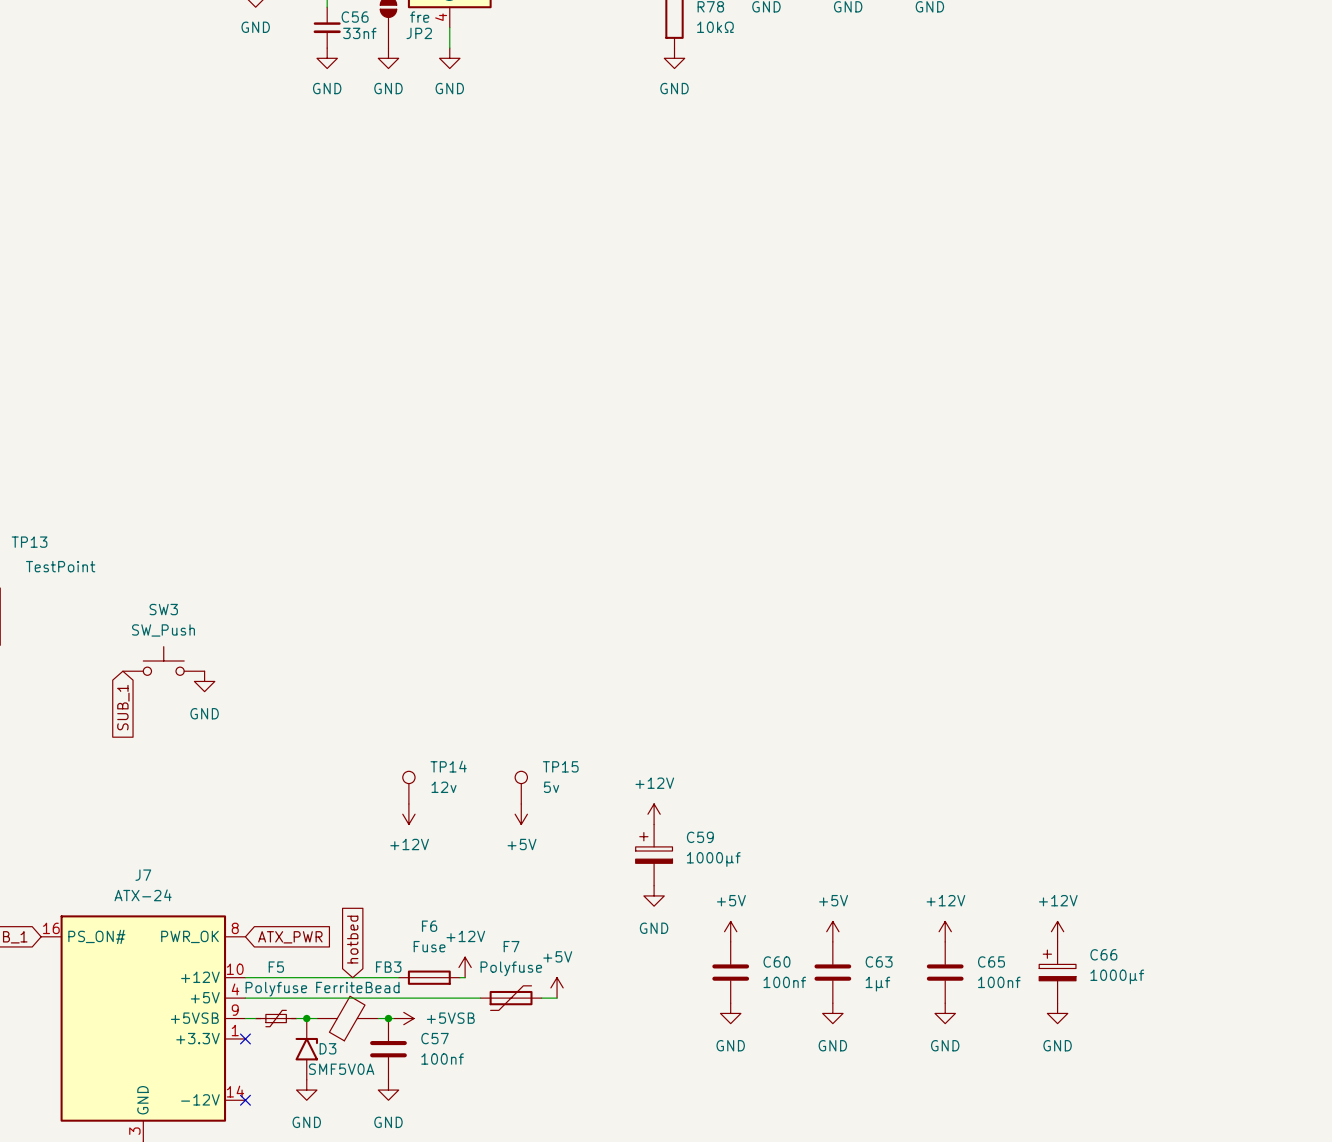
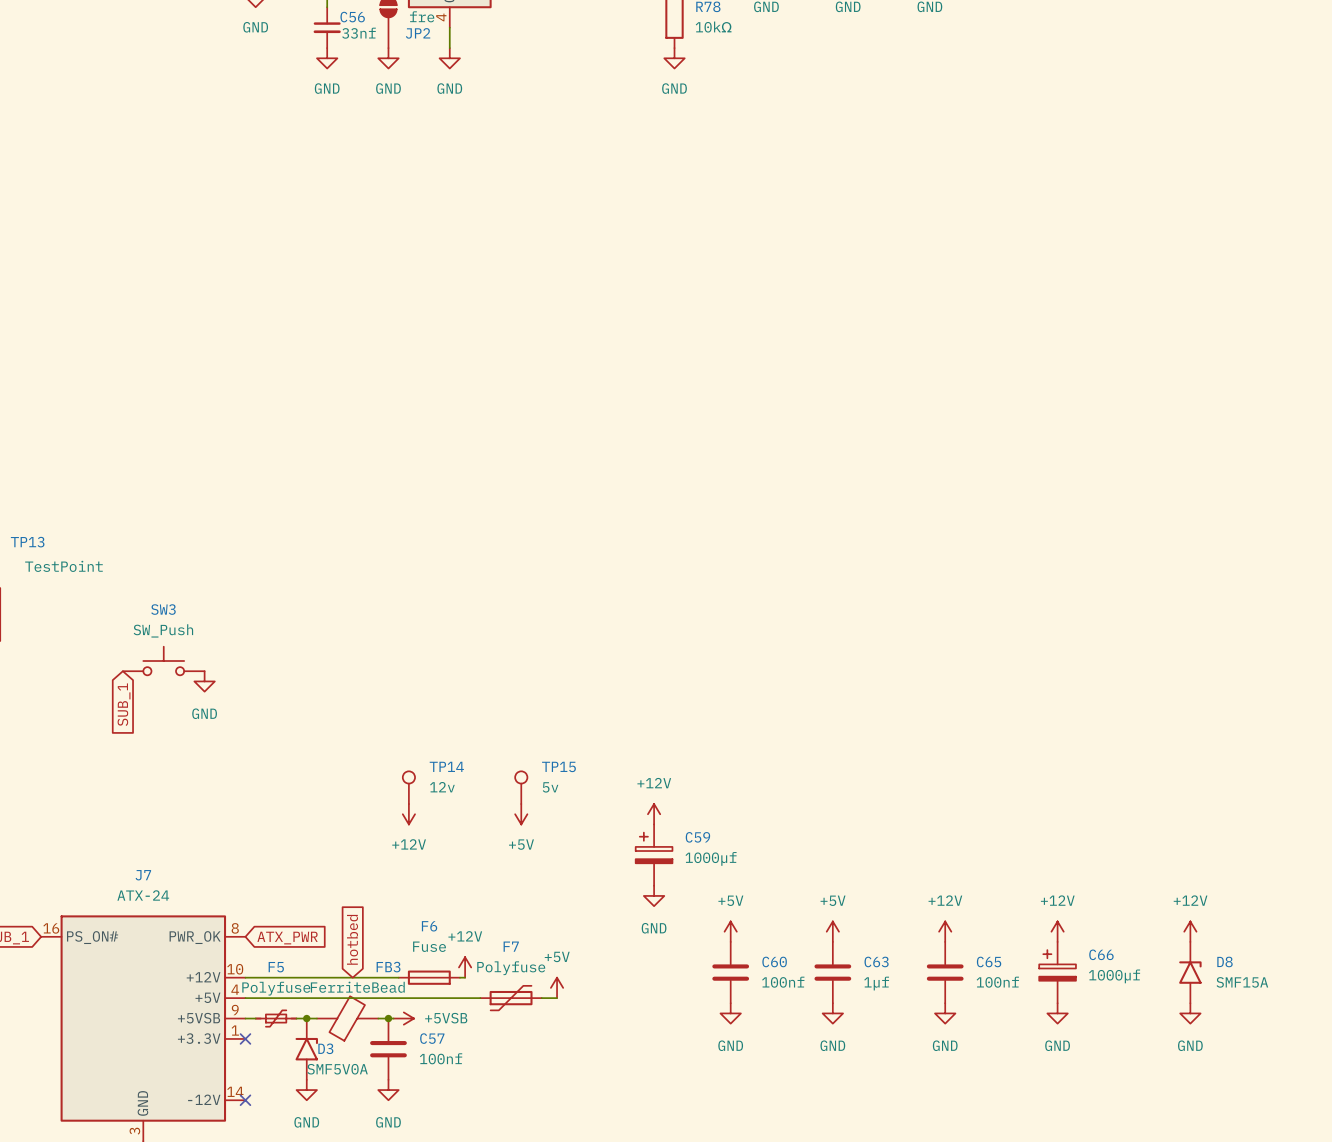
power symbol: none -> +12V (1190, 931)
D8: none -> SMF15A (1190, 972)
power symbol: none -> GND (1190, 1013)

